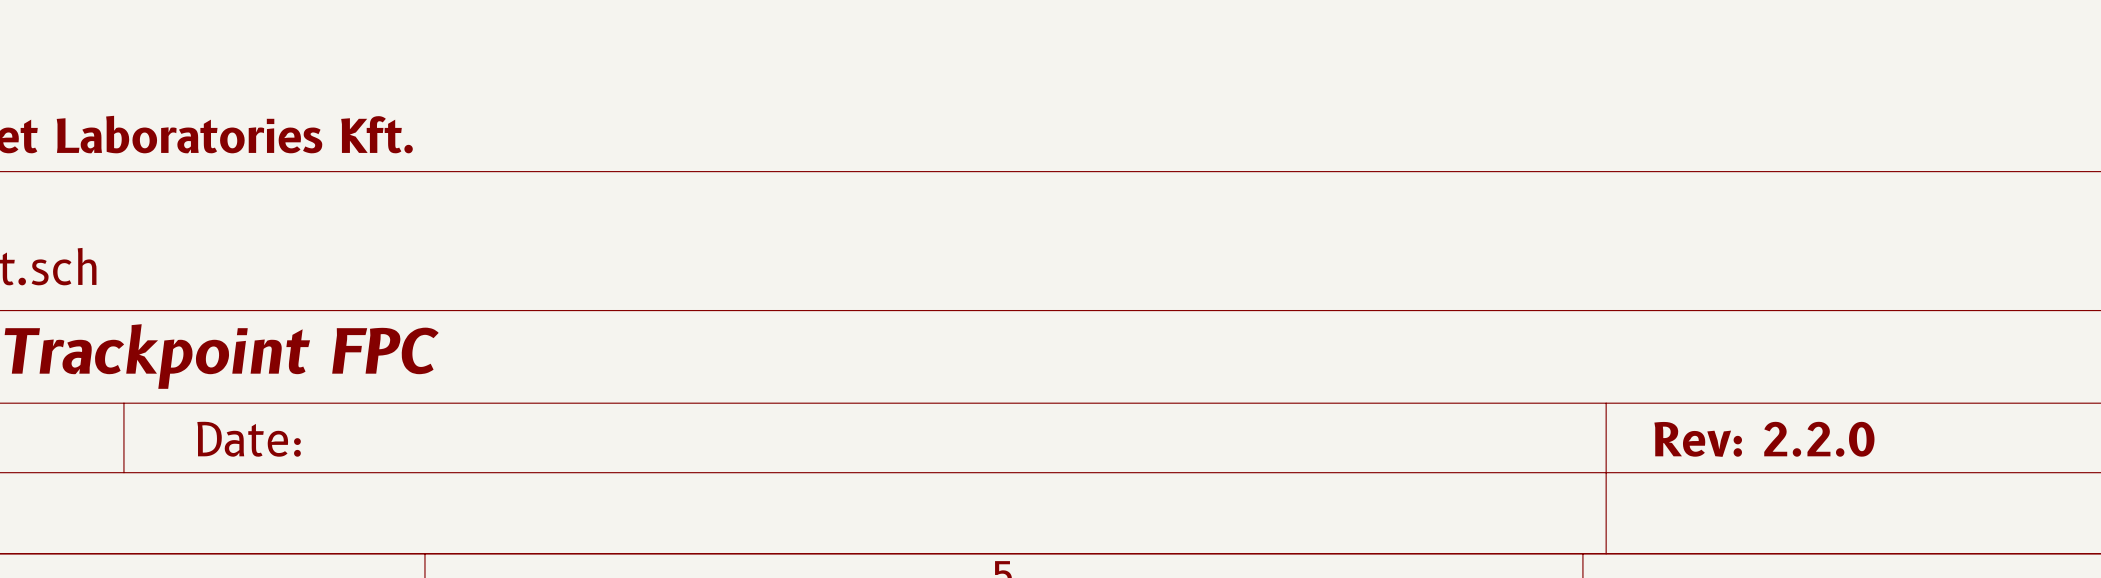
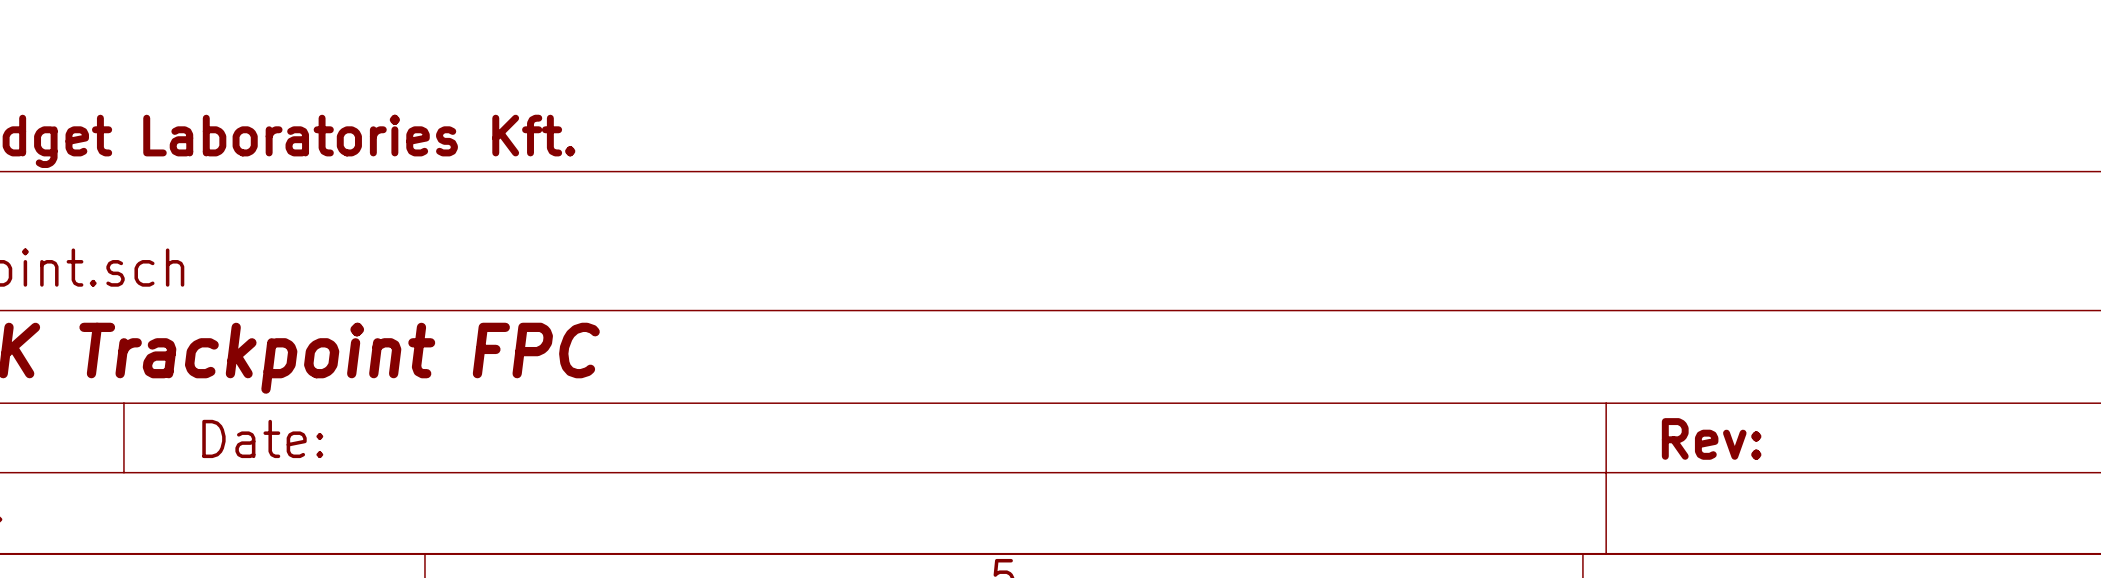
title block: Rev: 2.2.0 (1764, 439) -> Rev: (1711, 438)

